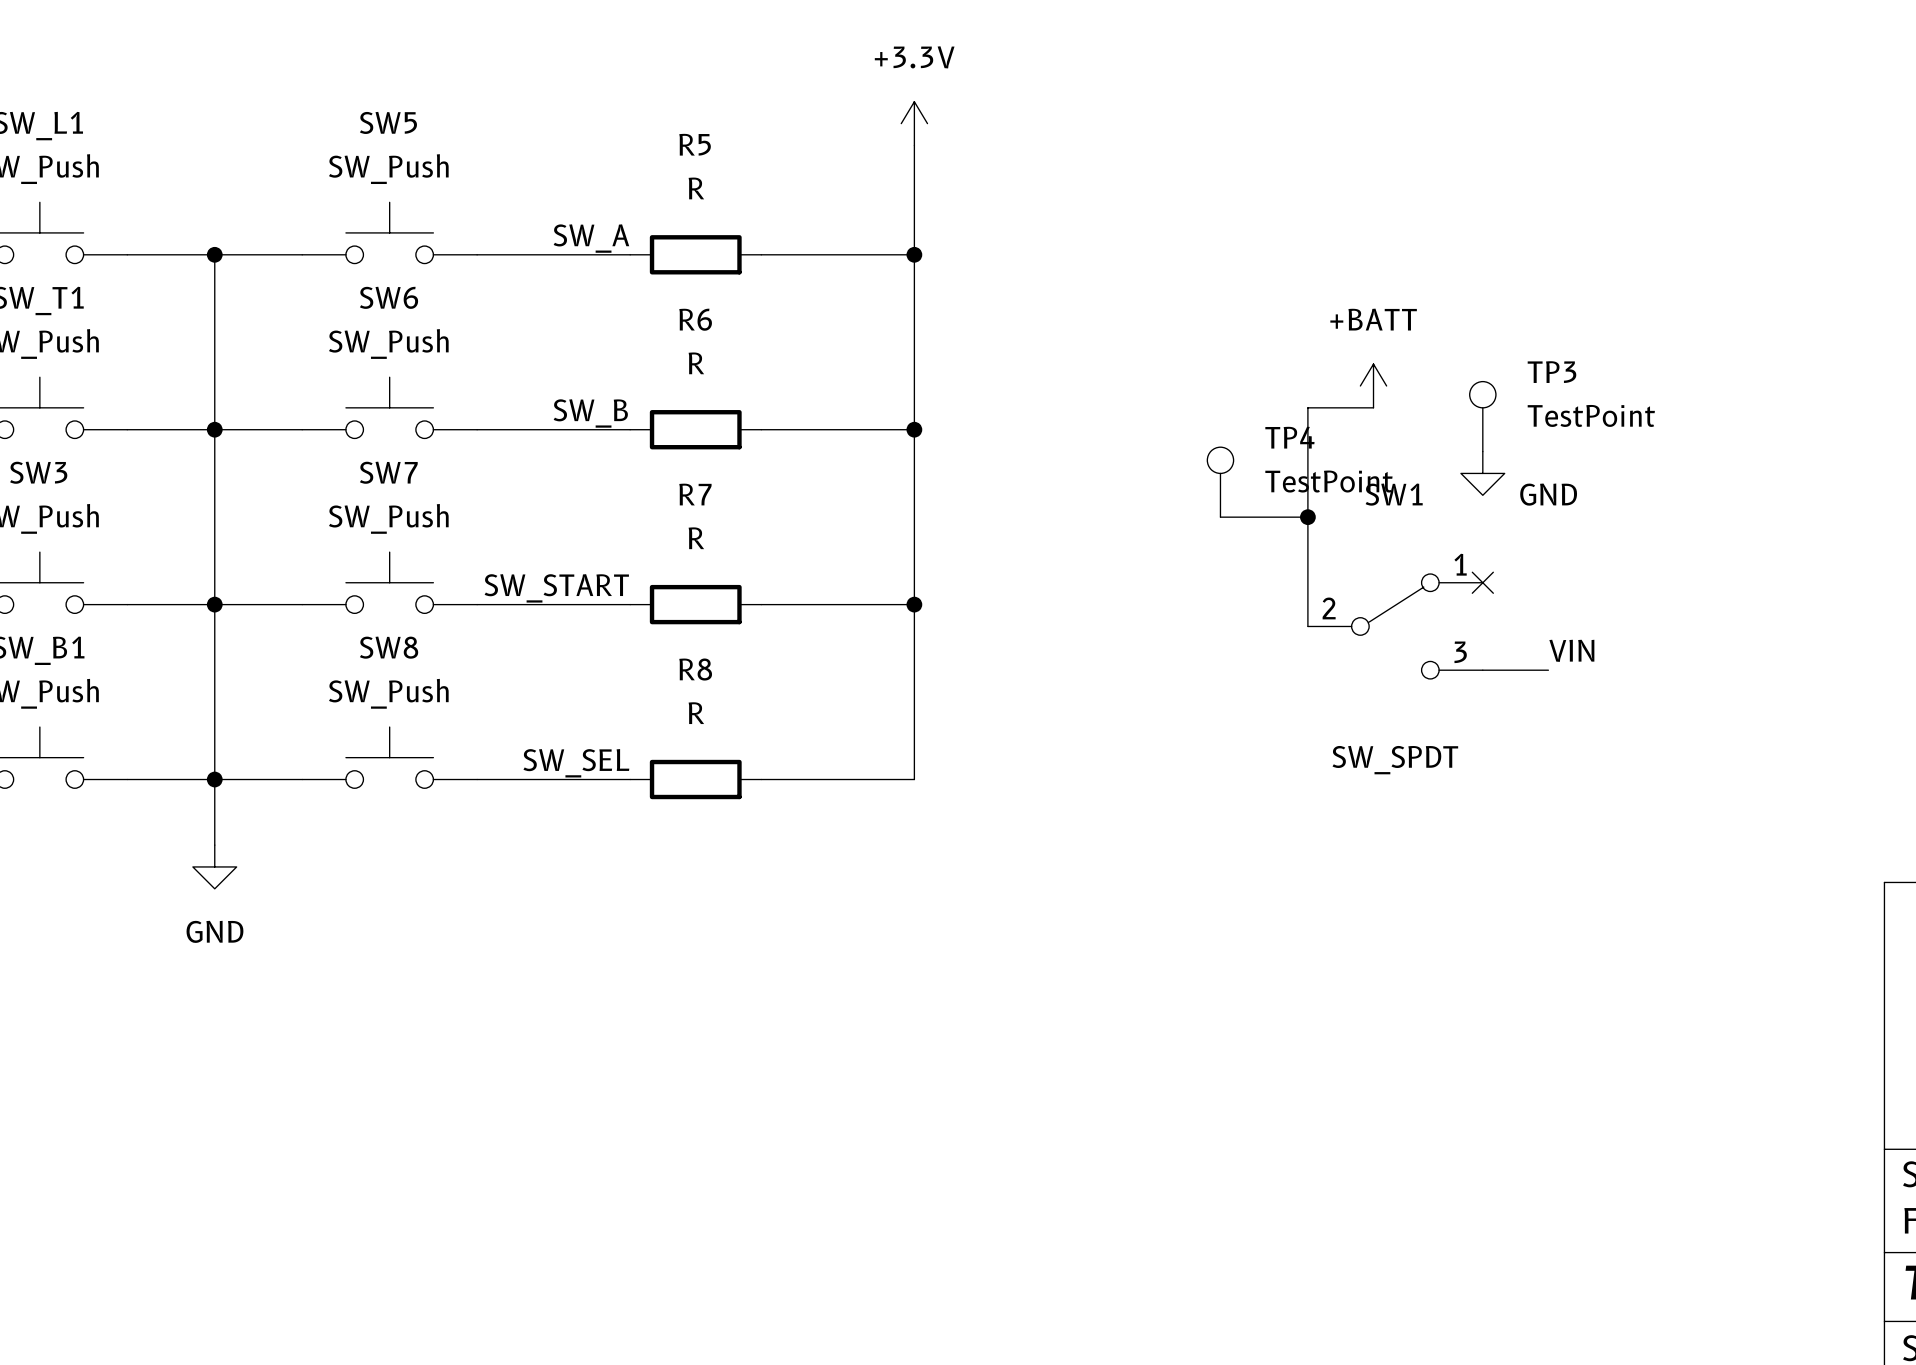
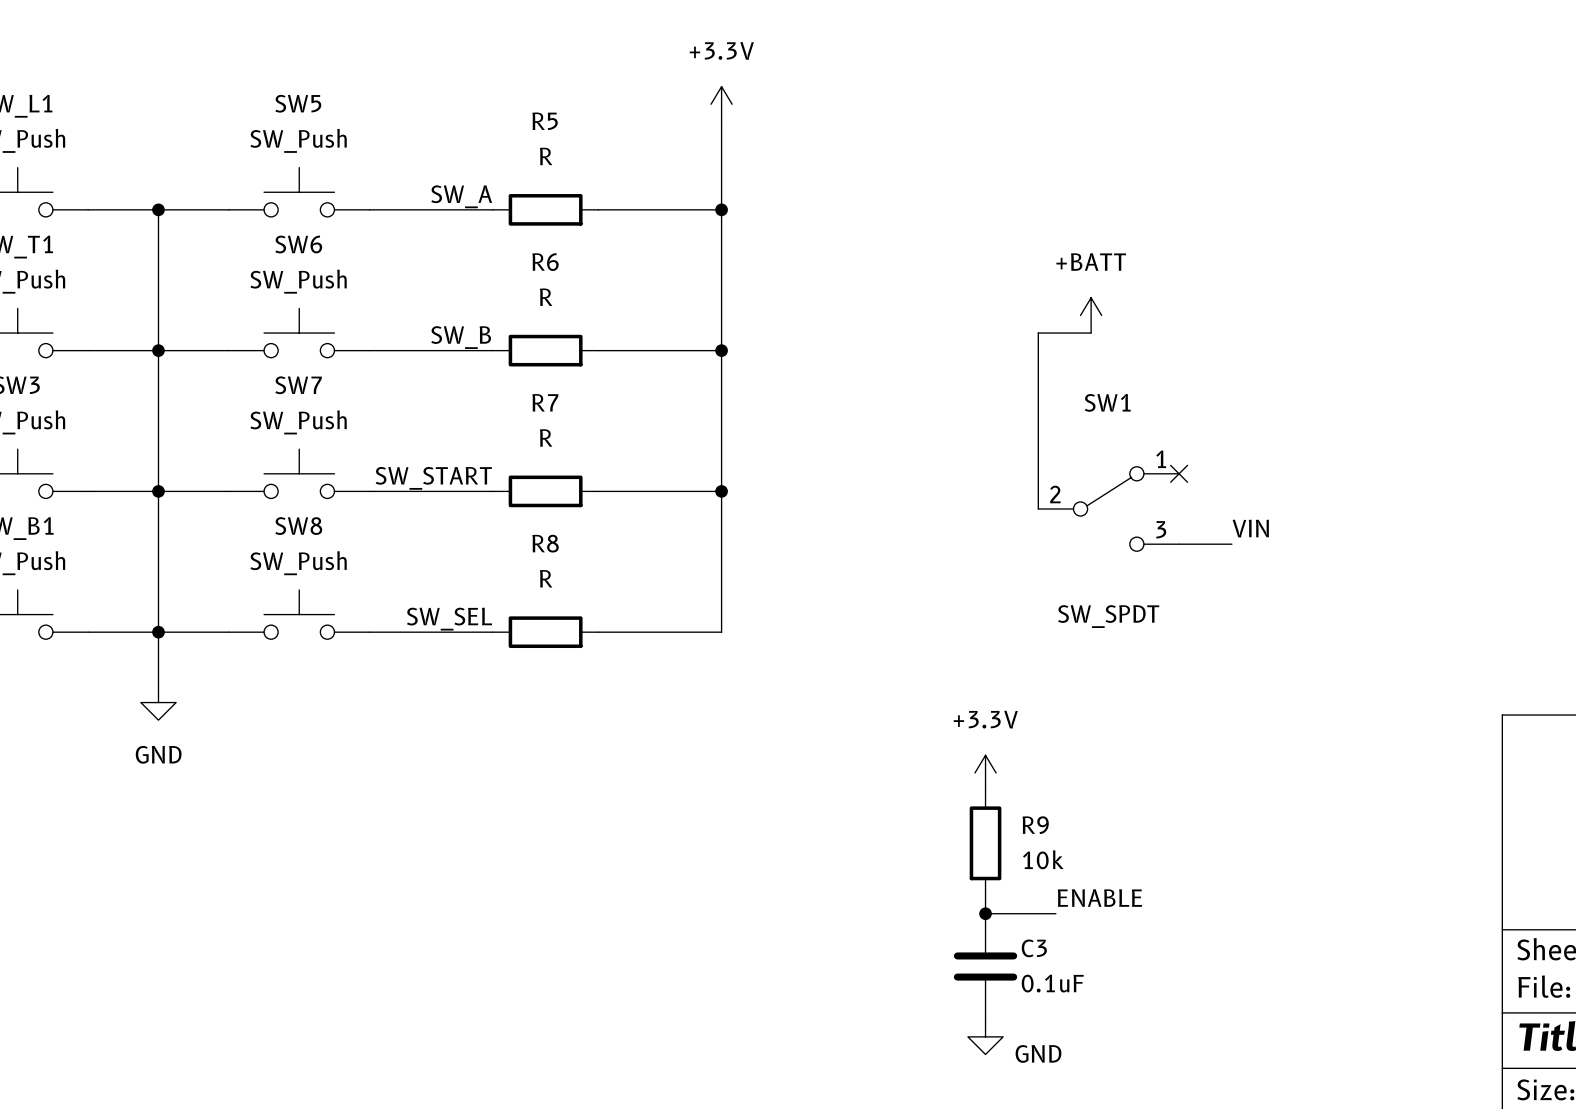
TP3: TestPoint (1482, 416) -> none
power symbol: GND (1482, 473) -> none
TP4: TestPoint (1220, 482) -> none
wire: (1220, 517) (1307, 517) -> none
junction: (1307, 517) -> none
power symbol: none -> +3.3V (985, 772)
R9: none -> 10k (985, 843)
wire: none -> (985, 896) (985, 913) (1055, 913)
label: none -> ENABLE (1099, 898)
junction: none -> (985, 913)
C3: none -> 0.1uF (985, 966)
power symbol: none -> GND (985, 1036)

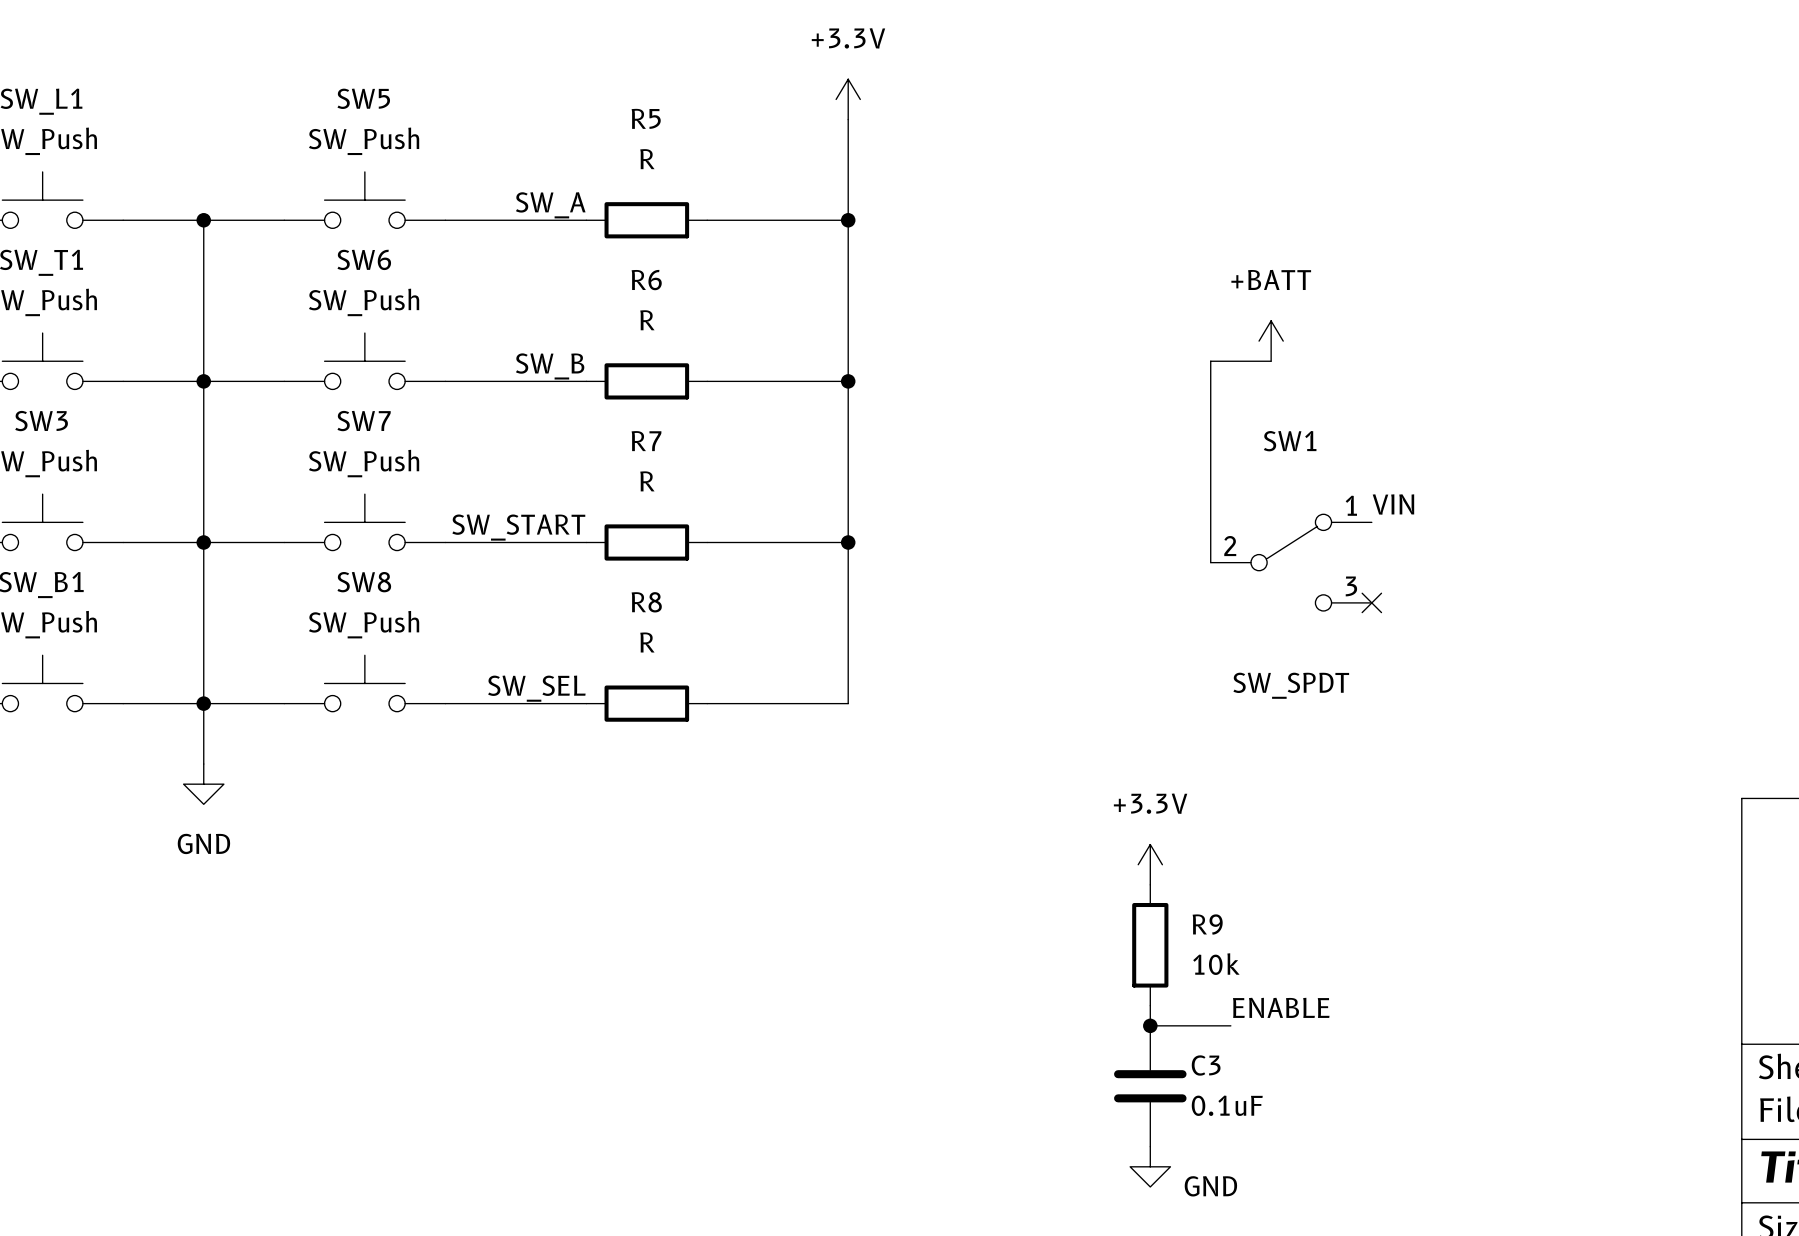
no-connect mark position: (1179, 473) -> (1371, 602)
label position: VIN (1250, 528) -> VIN (1393, 504)
wire: (1179, 544) (1231, 544) -> none

